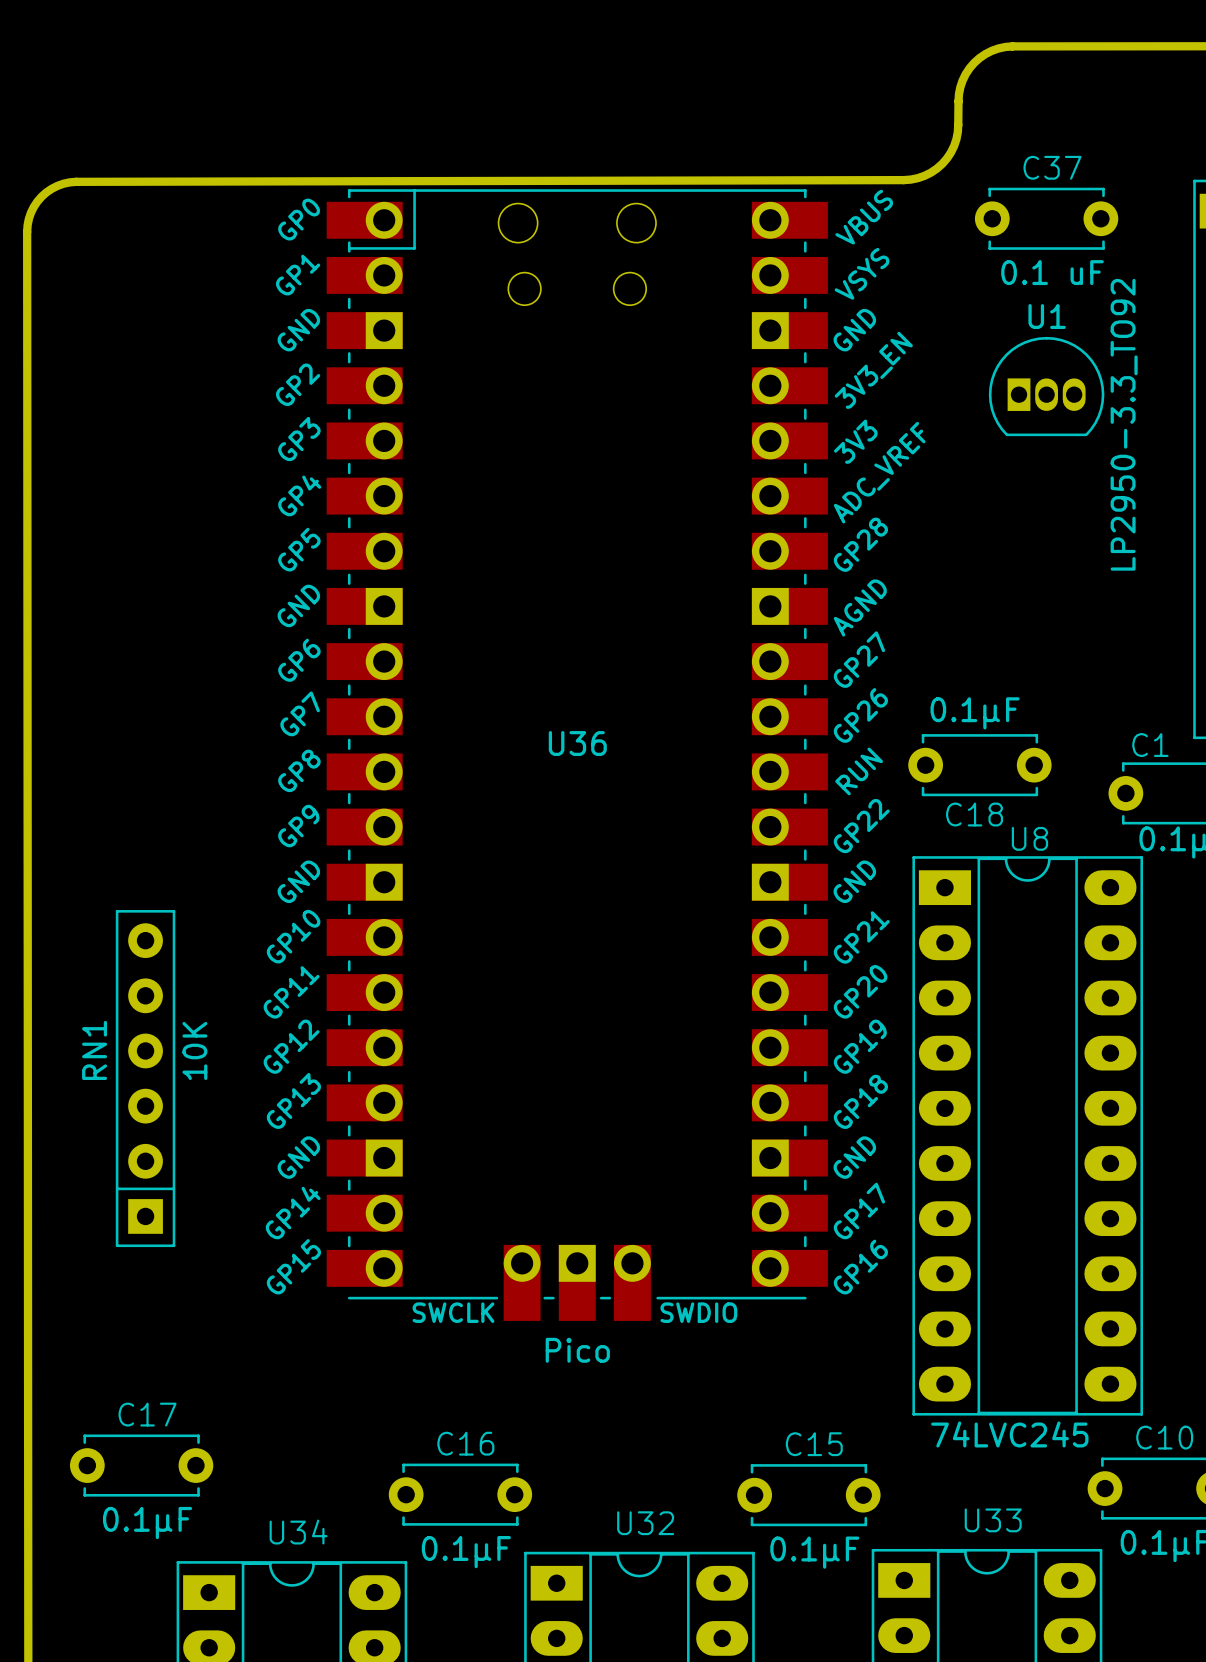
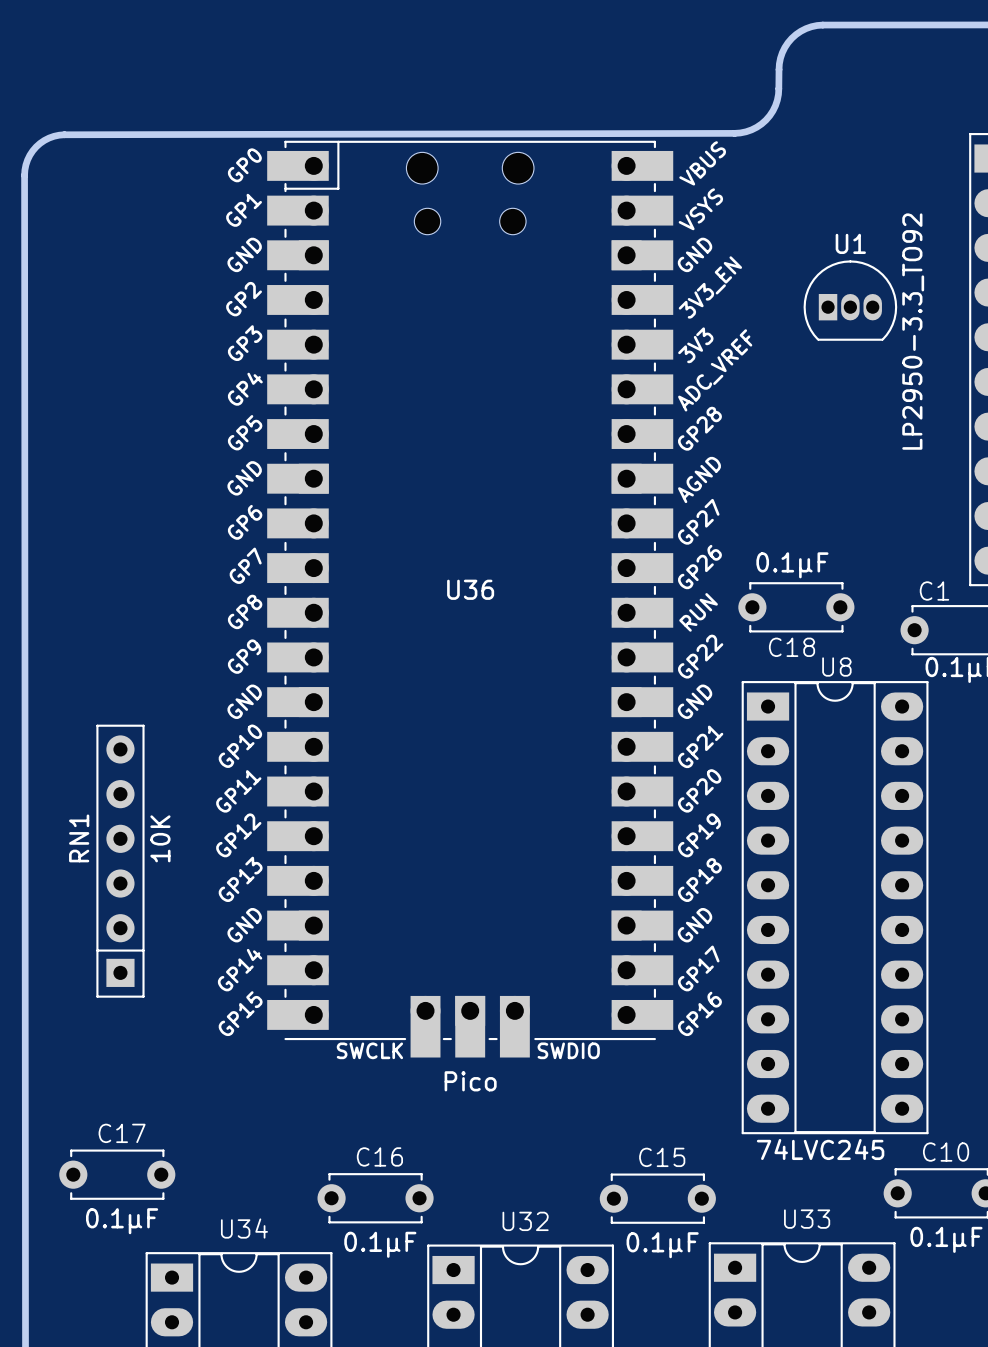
C37: 0.1 uF (1046, 218) -> none

